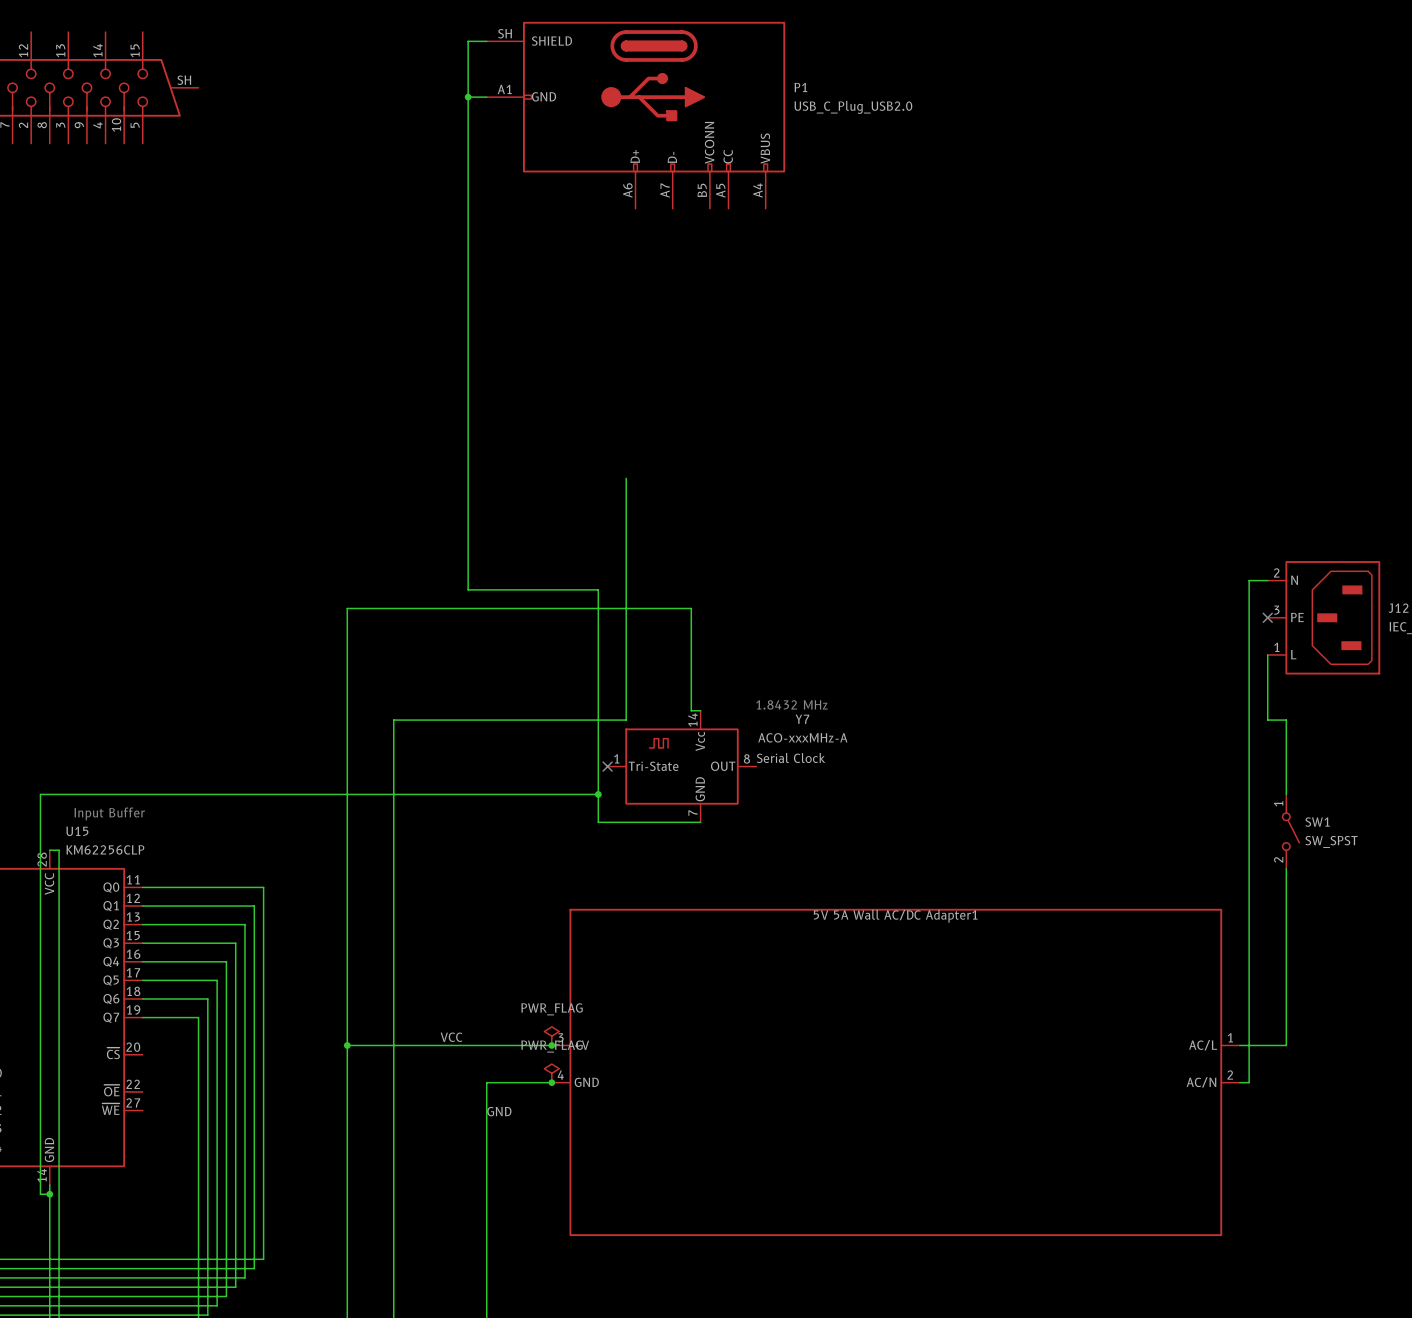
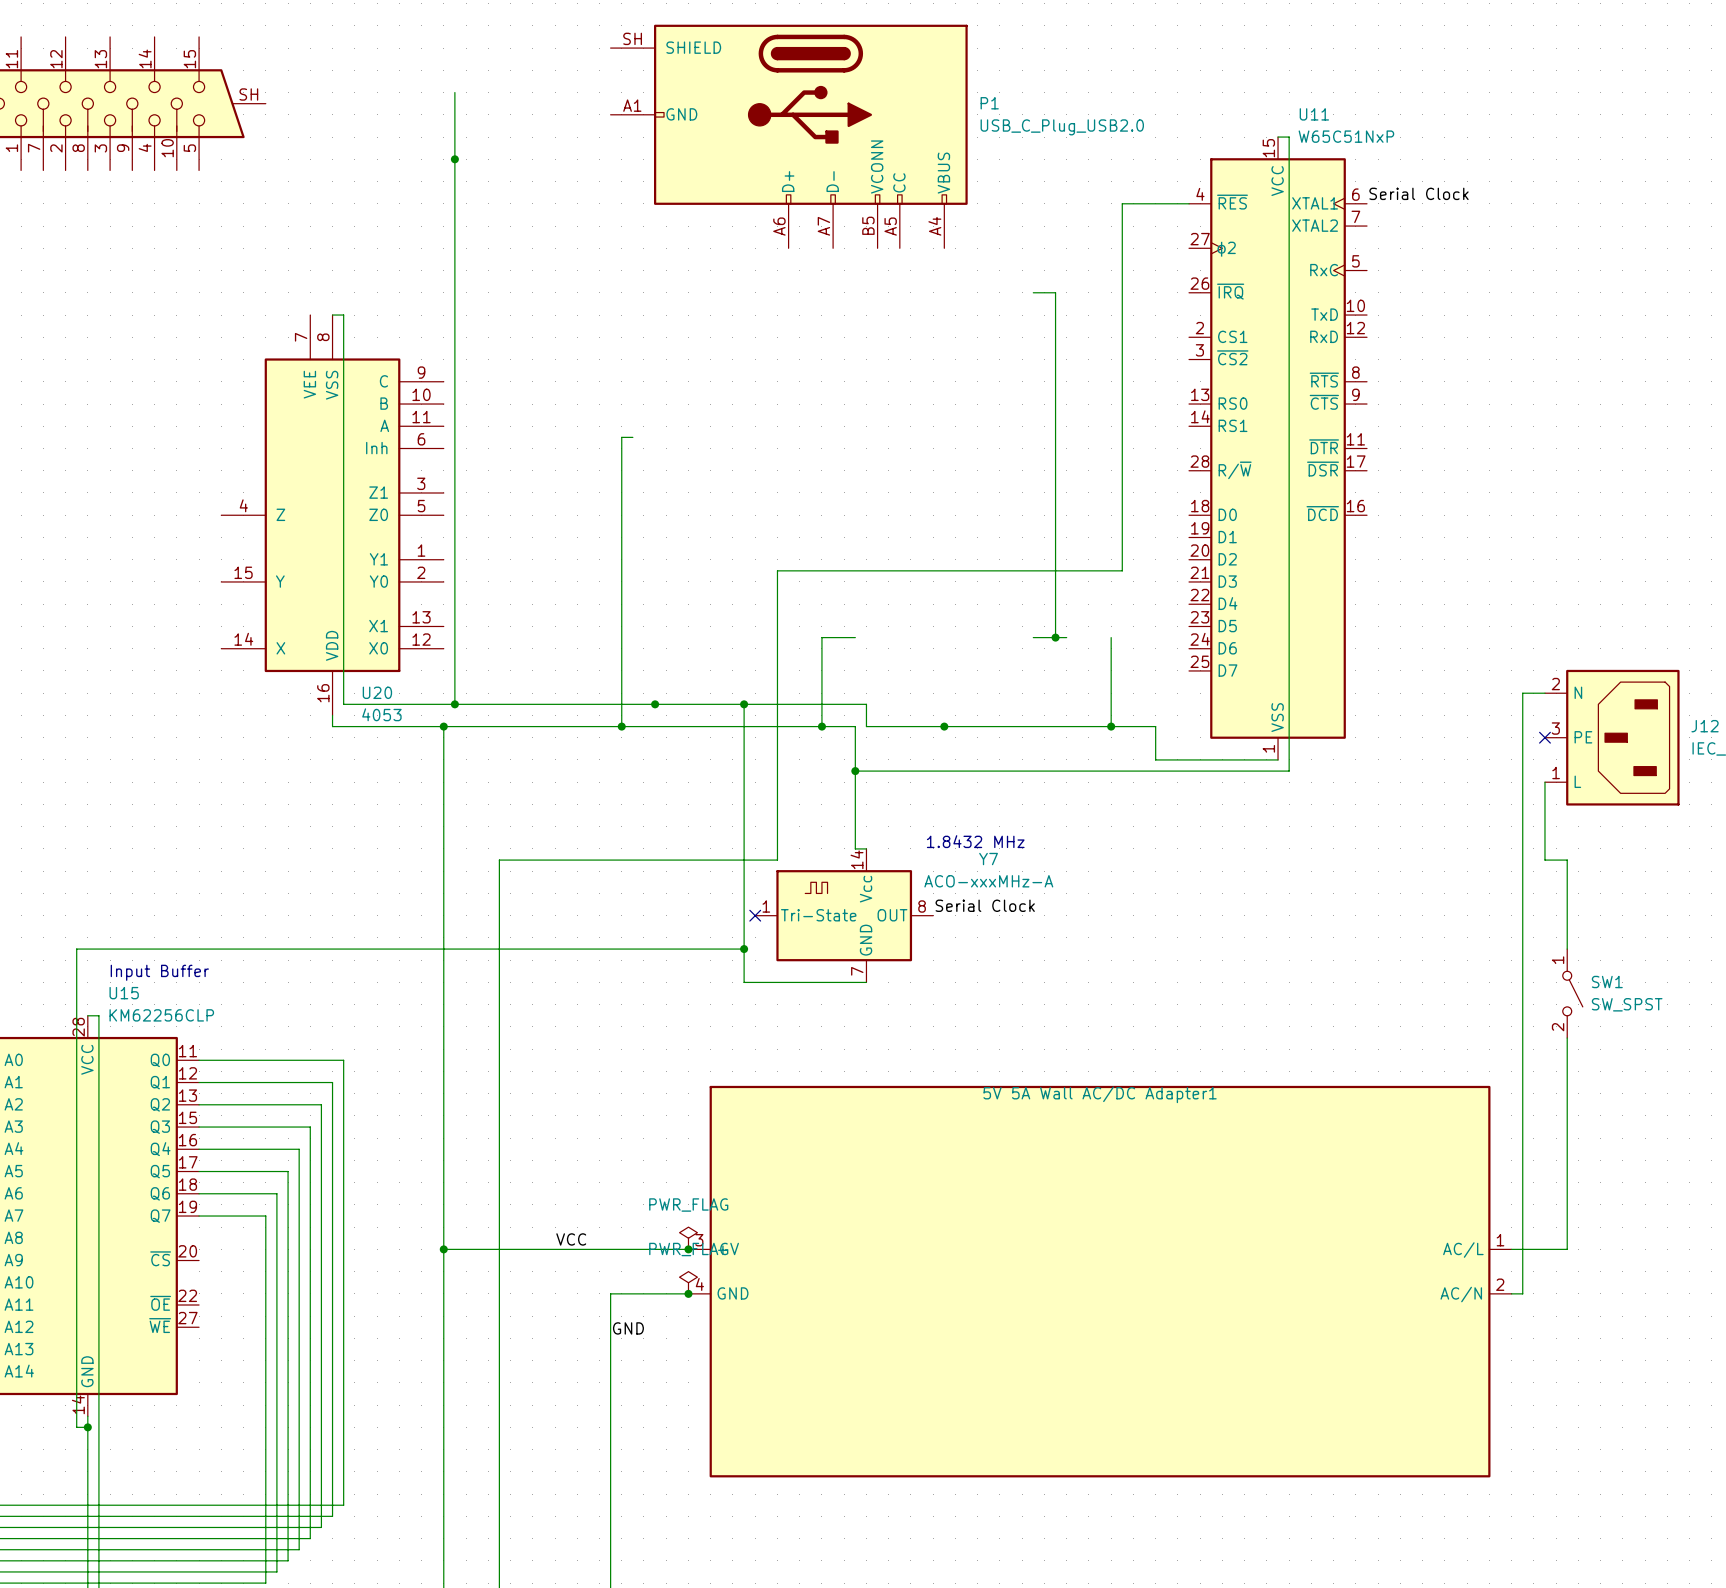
wire: (486, 41) (468, 41) (468, 589) -> (332, 315) (343, 315) (343, 704) (588, 704)
wire: none -> (454, 92) (454, 704)
wire: (468, 97) (486, 97) -> none
junction: (468, 97) -> none
wire: none -> (1278, 137) (1289, 137) (1289, 771) (855, 771)
junction: none -> (454, 159)
label: none -> Serial Clock (1419, 193)
wire: none -> (1189, 203) (1122, 203) (1122, 570) (777, 570)
wire: none -> (1033, 292) (1055, 292) (1055, 637)
wire: none -> (632, 437) (621, 437) (621, 726)
U11: none -> W65C51NxP (1278, 448)
U20: none -> 4053 (332, 515)
wire: none -> (855, 637) (821, 637) (821, 726)
wire: none -> (1033, 637) (1066, 637)
junction: none -> (1055, 637)
wire: none -> (1111, 637) (1111, 726)
junction: none -> (454, 704)
junction: none -> (655, 704)
wire: none -> (744, 704) (866, 704) (866, 726) (1155, 726) (1155, 759) (1278, 759)
junction: none -> (744, 704)
wire: none -> (332, 715) (332, 726) (443, 726)
junction: none -> (443, 726)
junction: none -> (621, 726)
junction: none -> (821, 726)
junction: none -> (944, 726)
junction: none -> (1111, 726)
junction: none -> (855, 771)

